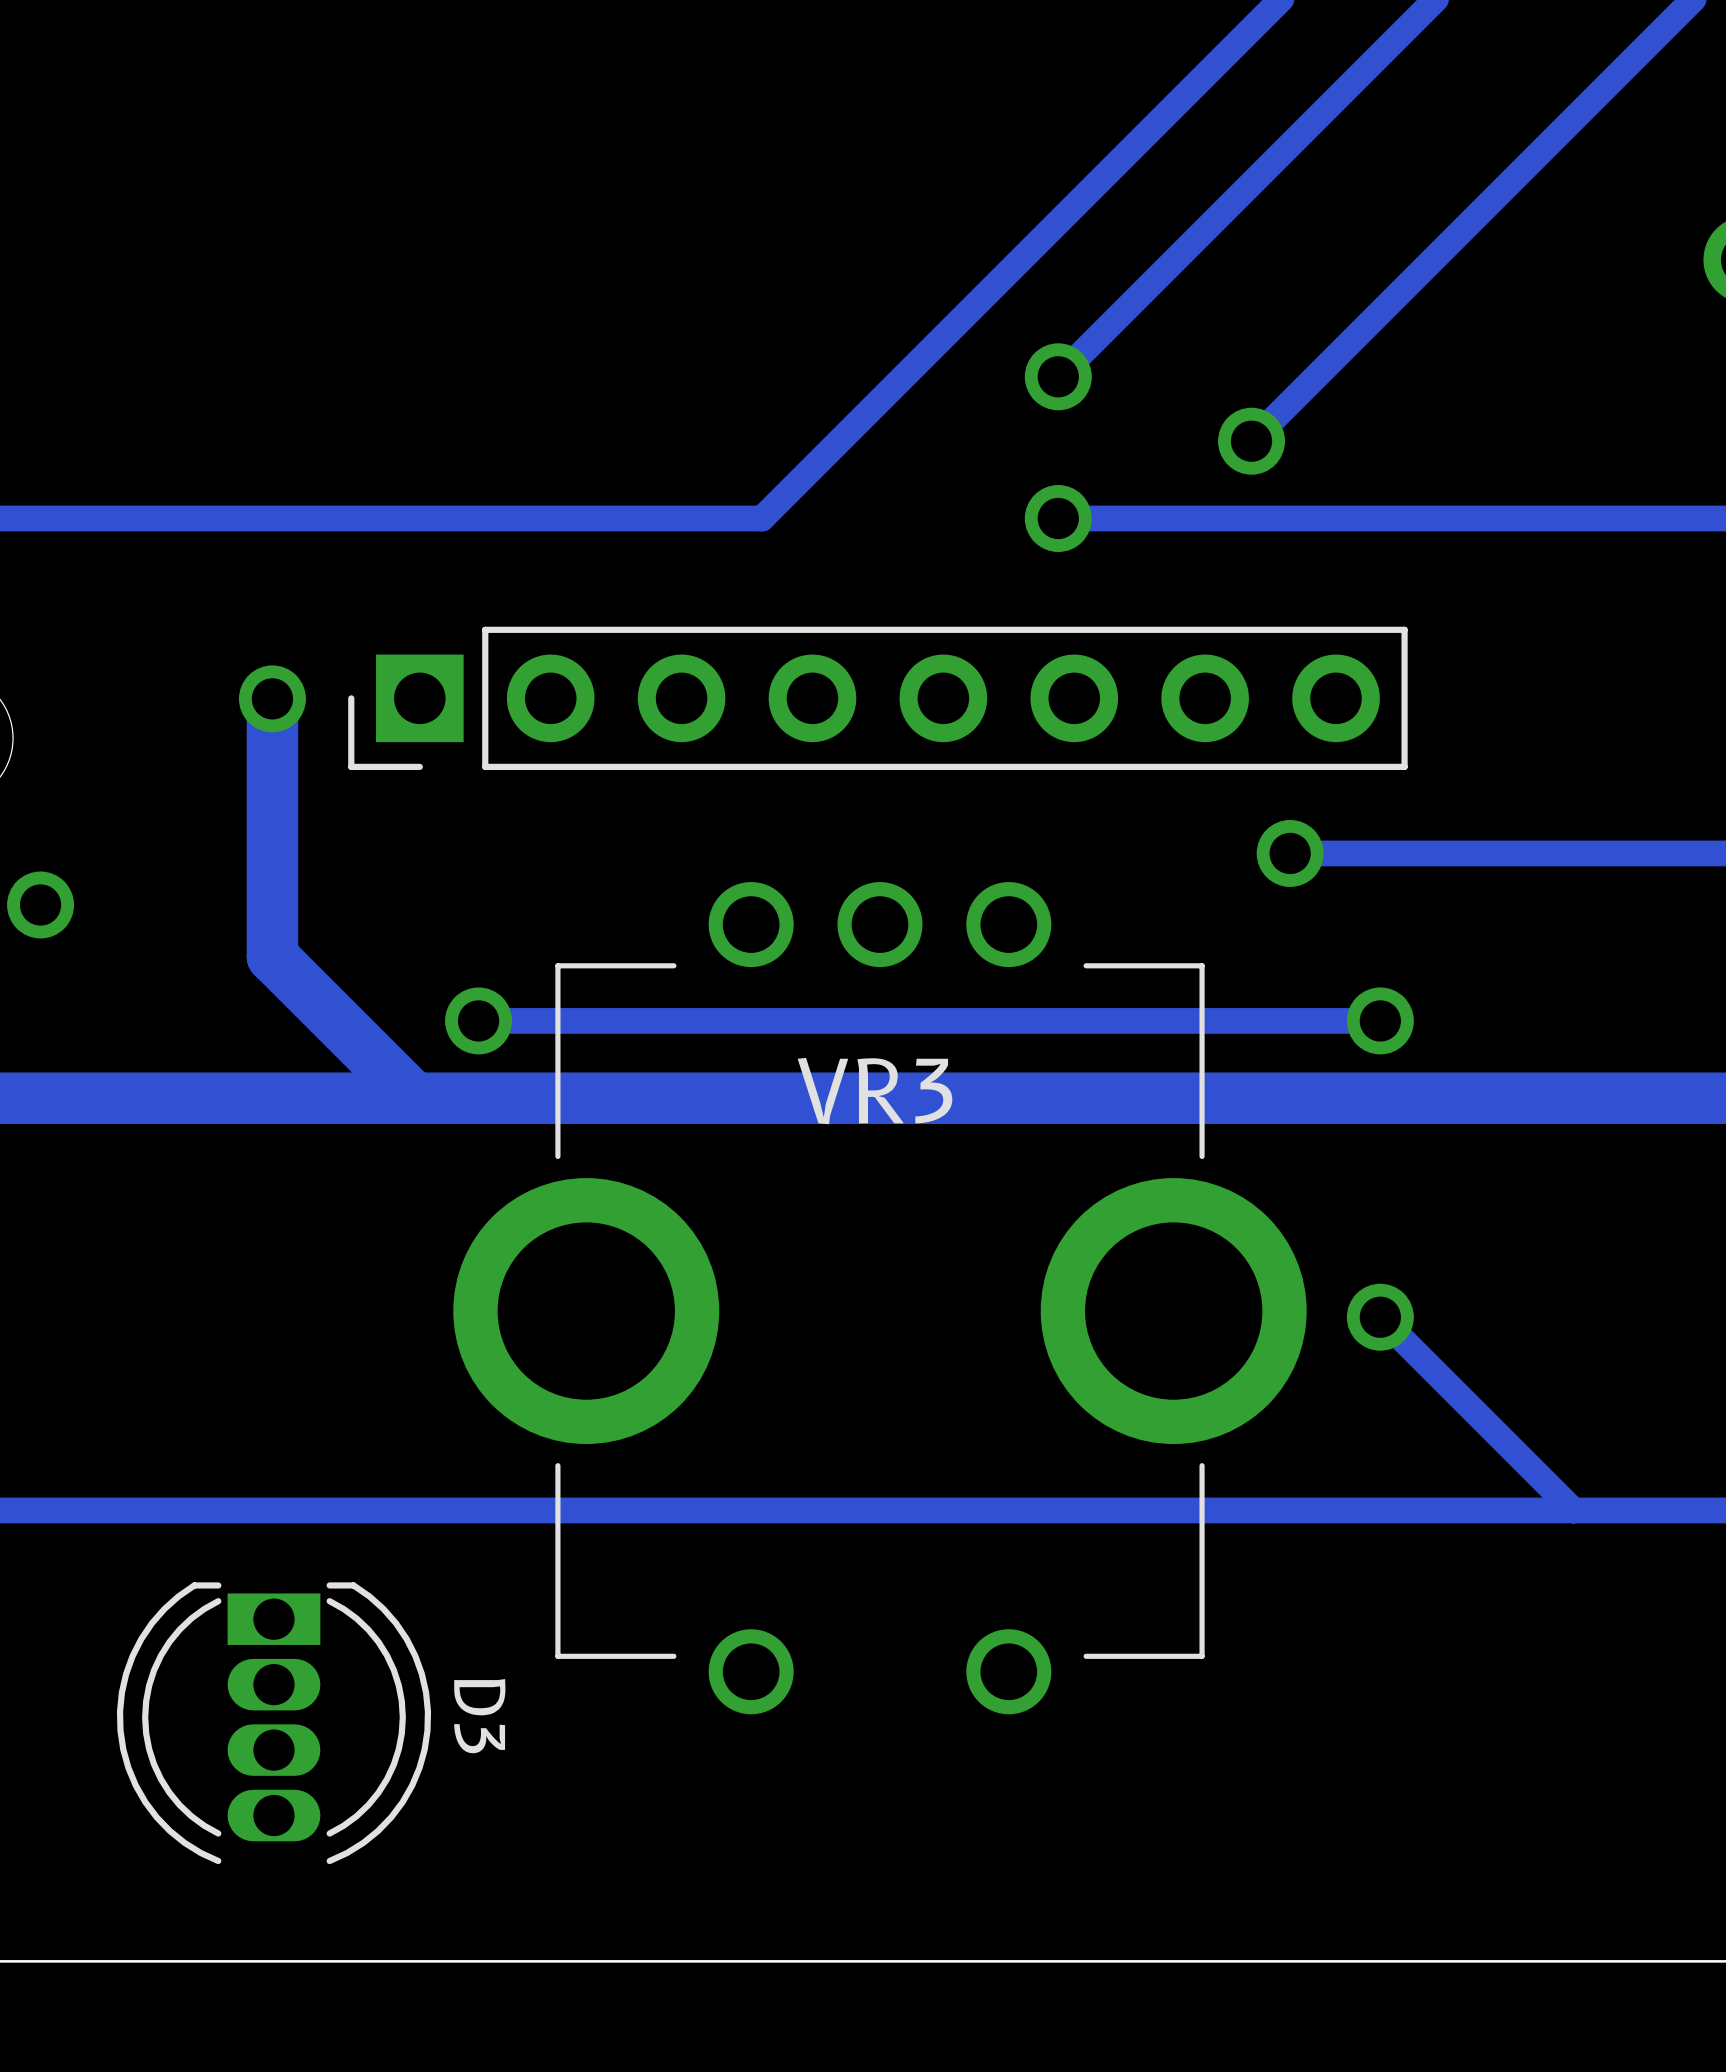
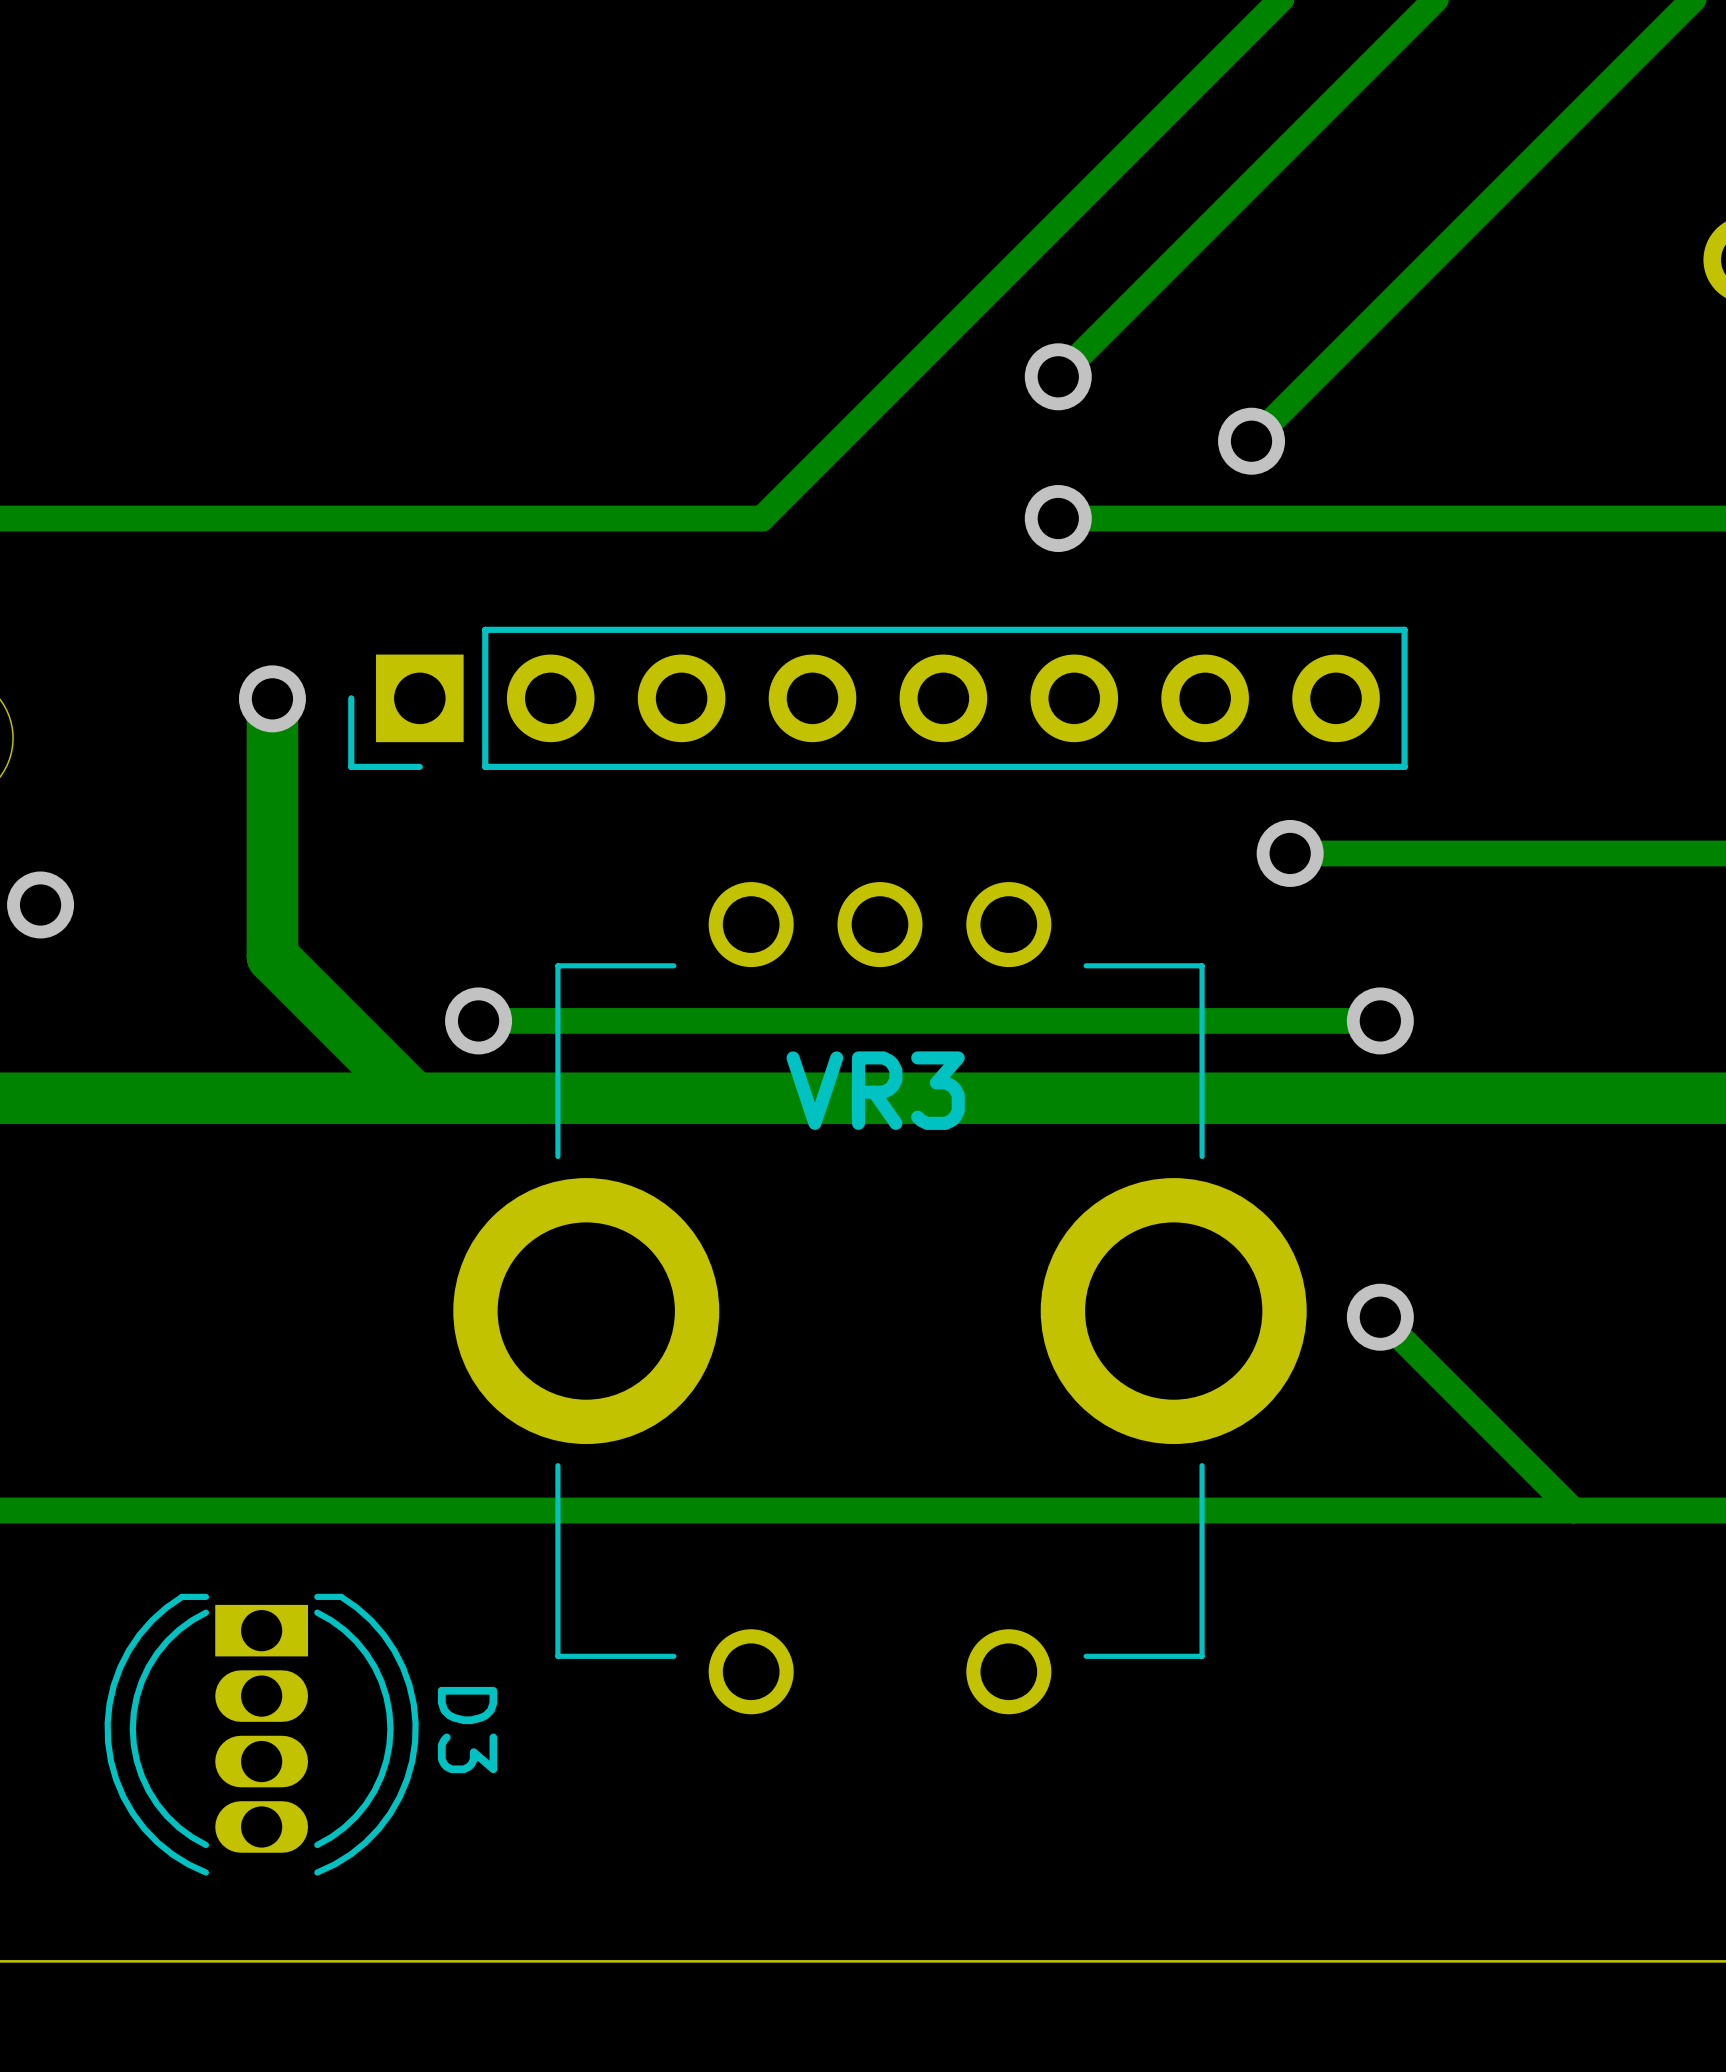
D3 position: (273, 1723) -> (261, 1734)

